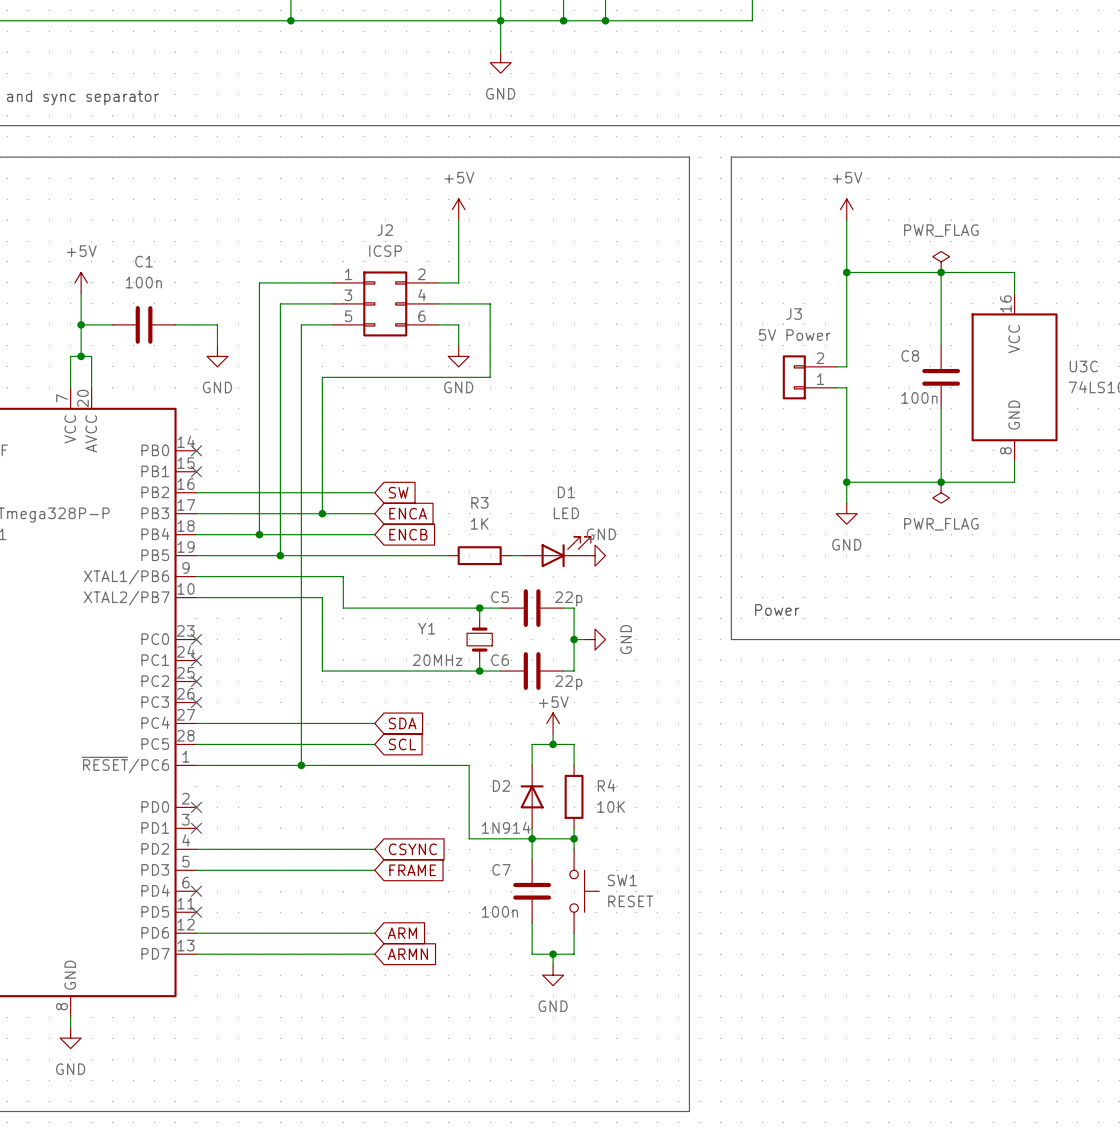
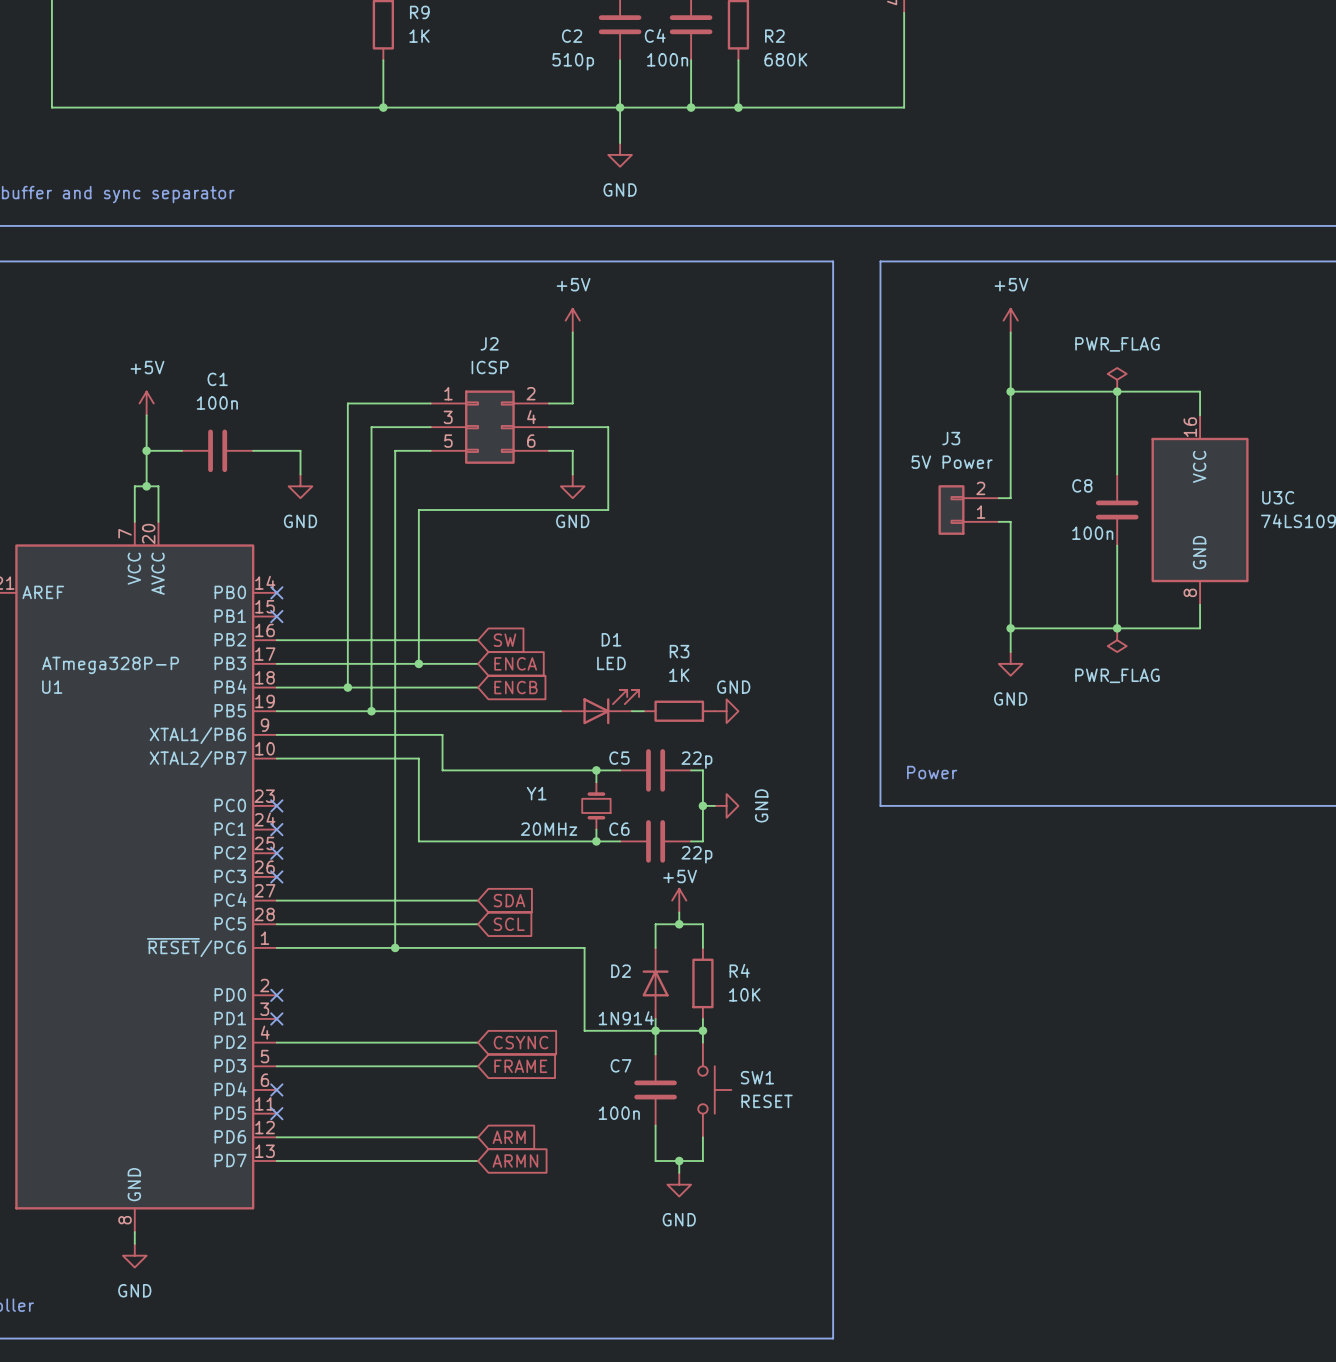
D1 position: (556, 551) -> (599, 707)
R3 position: (479, 555) -> (679, 711)

